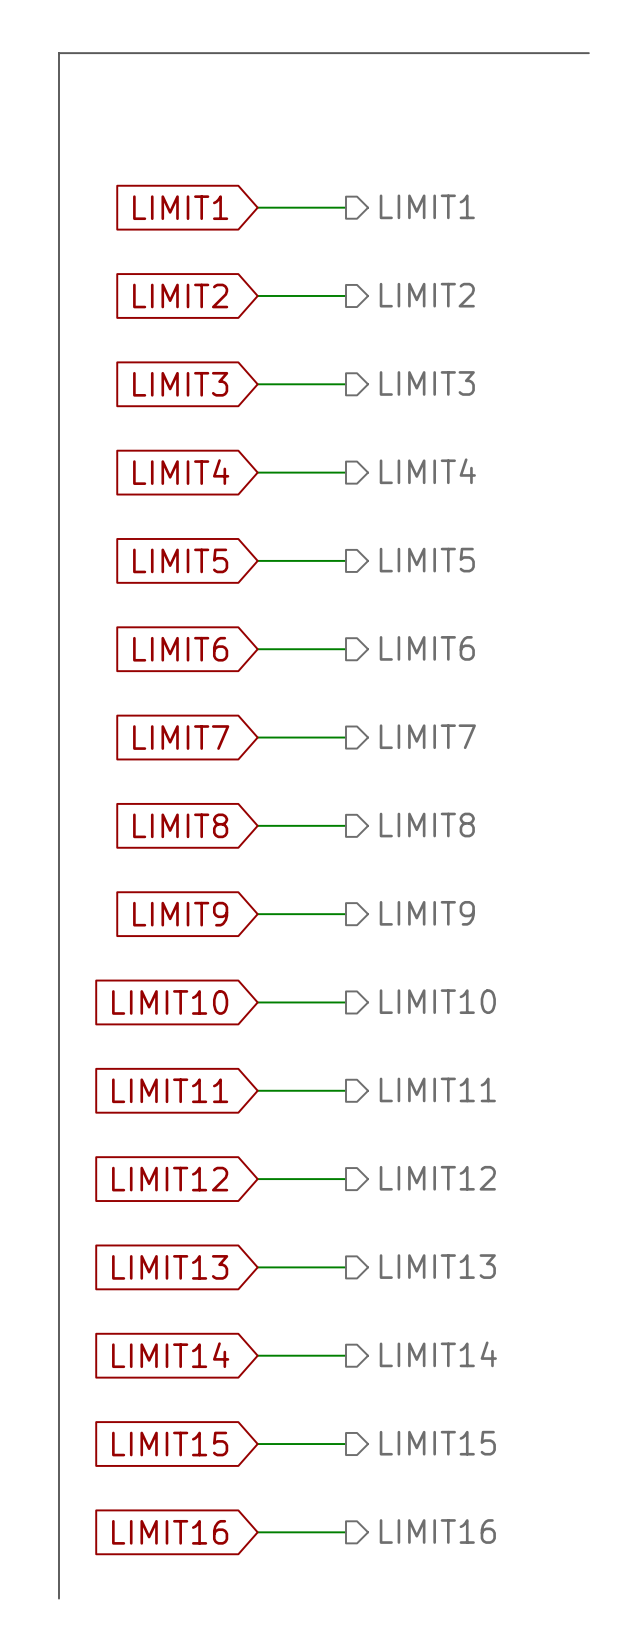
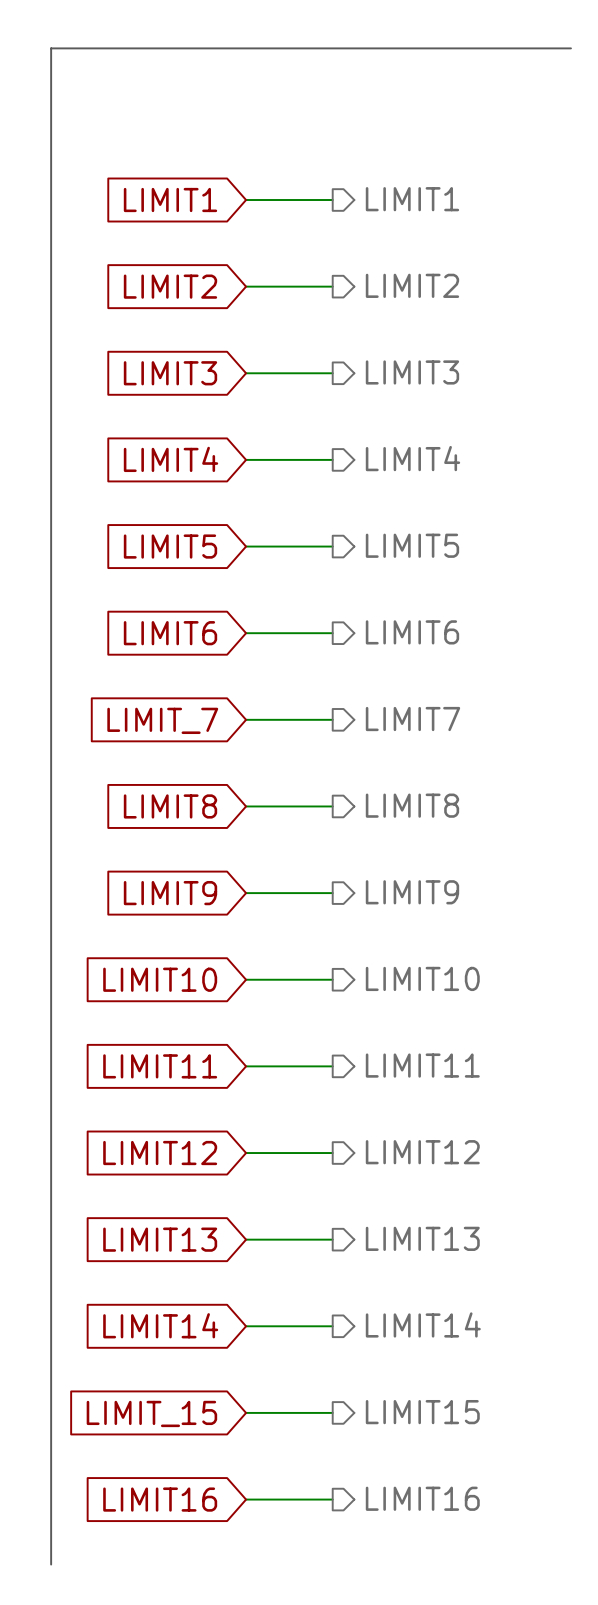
global label: LIMIT7 (181, 737) -> LIMIT_7 (162, 720)
global label: LIMIT15 (170, 1444) -> LIMIT_15 (151, 1413)

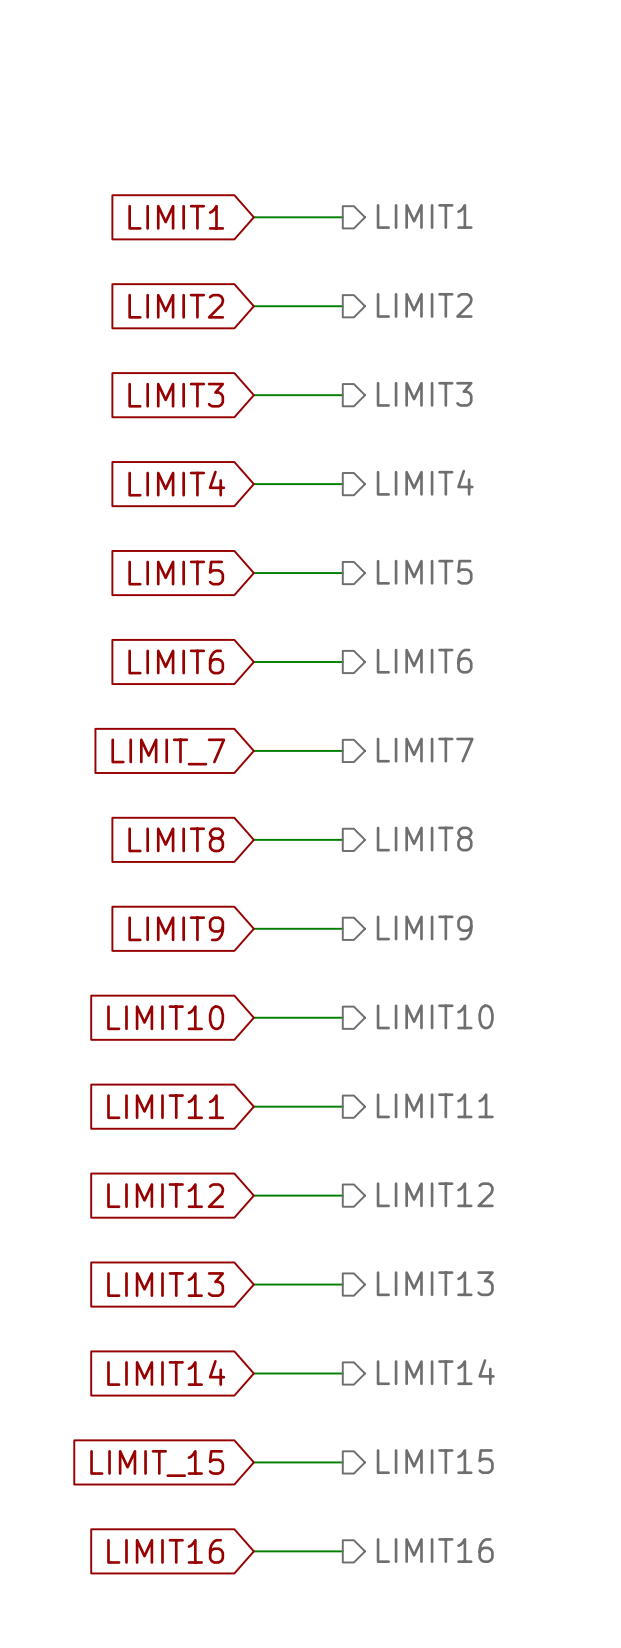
line: (570, 48) (51, 48) (51, 1564) -> none

